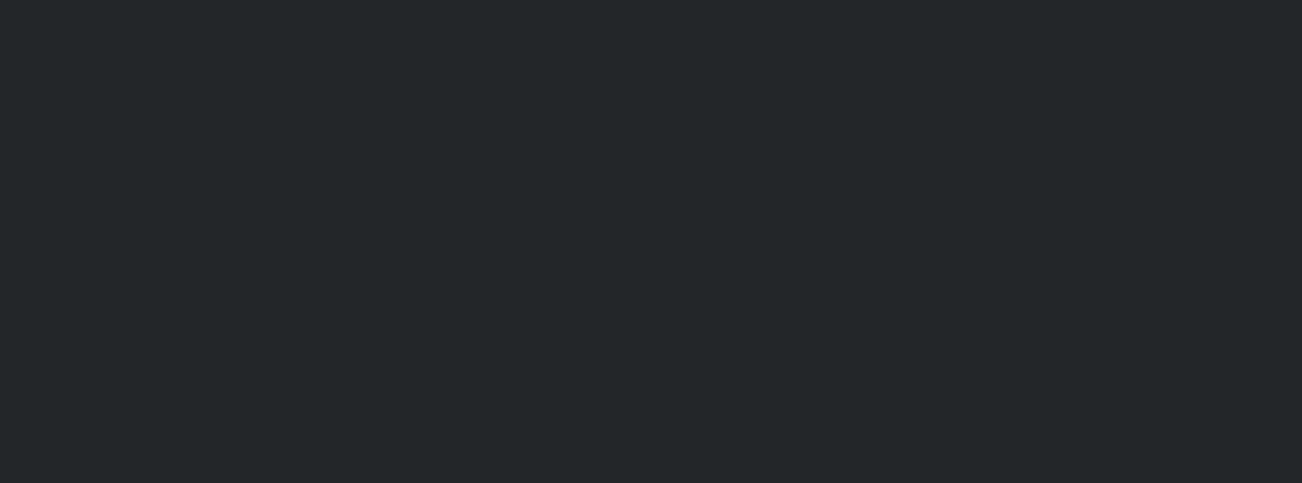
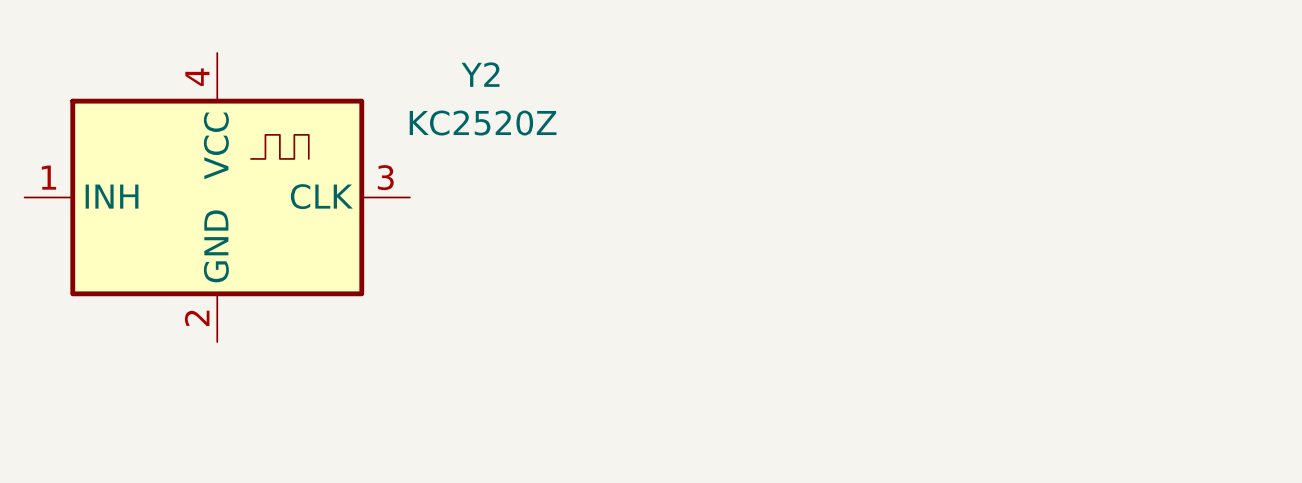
Y2: none -> KC2520Z (217, 197)

